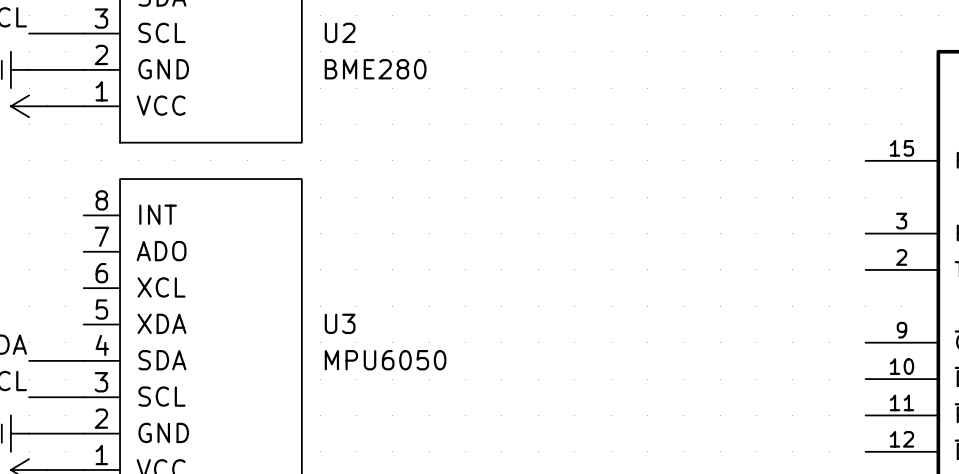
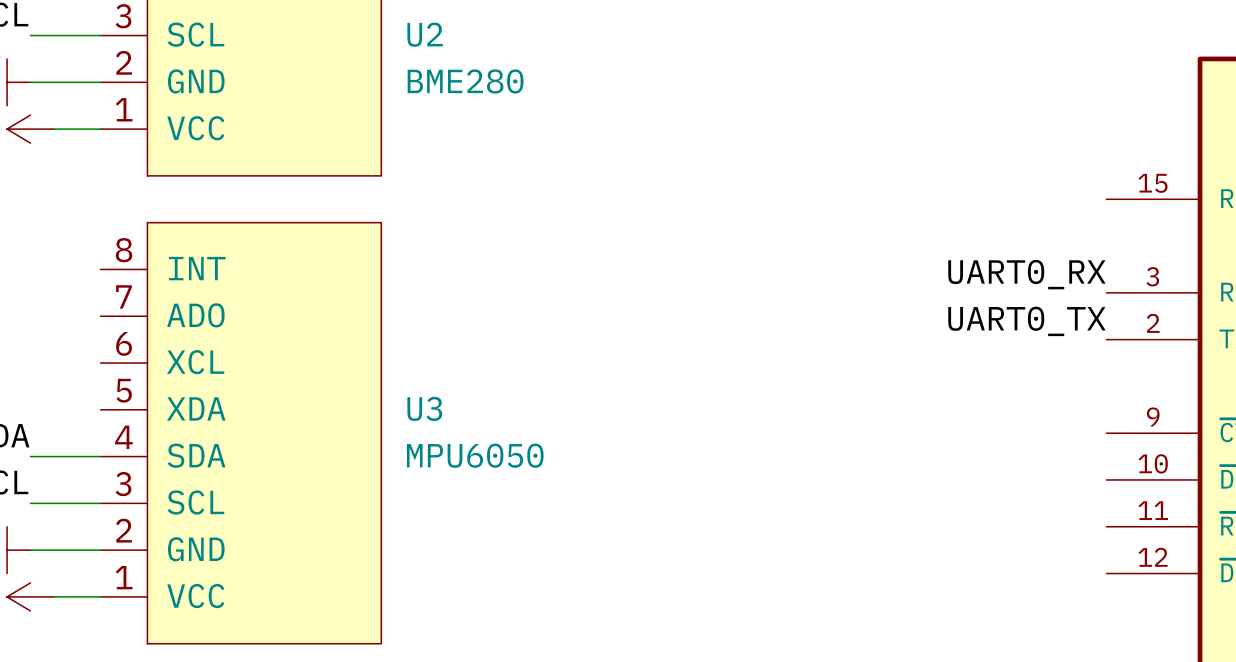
label: none -> UART0_RX (1026, 274)
label: none -> UART0_TX (1026, 321)

